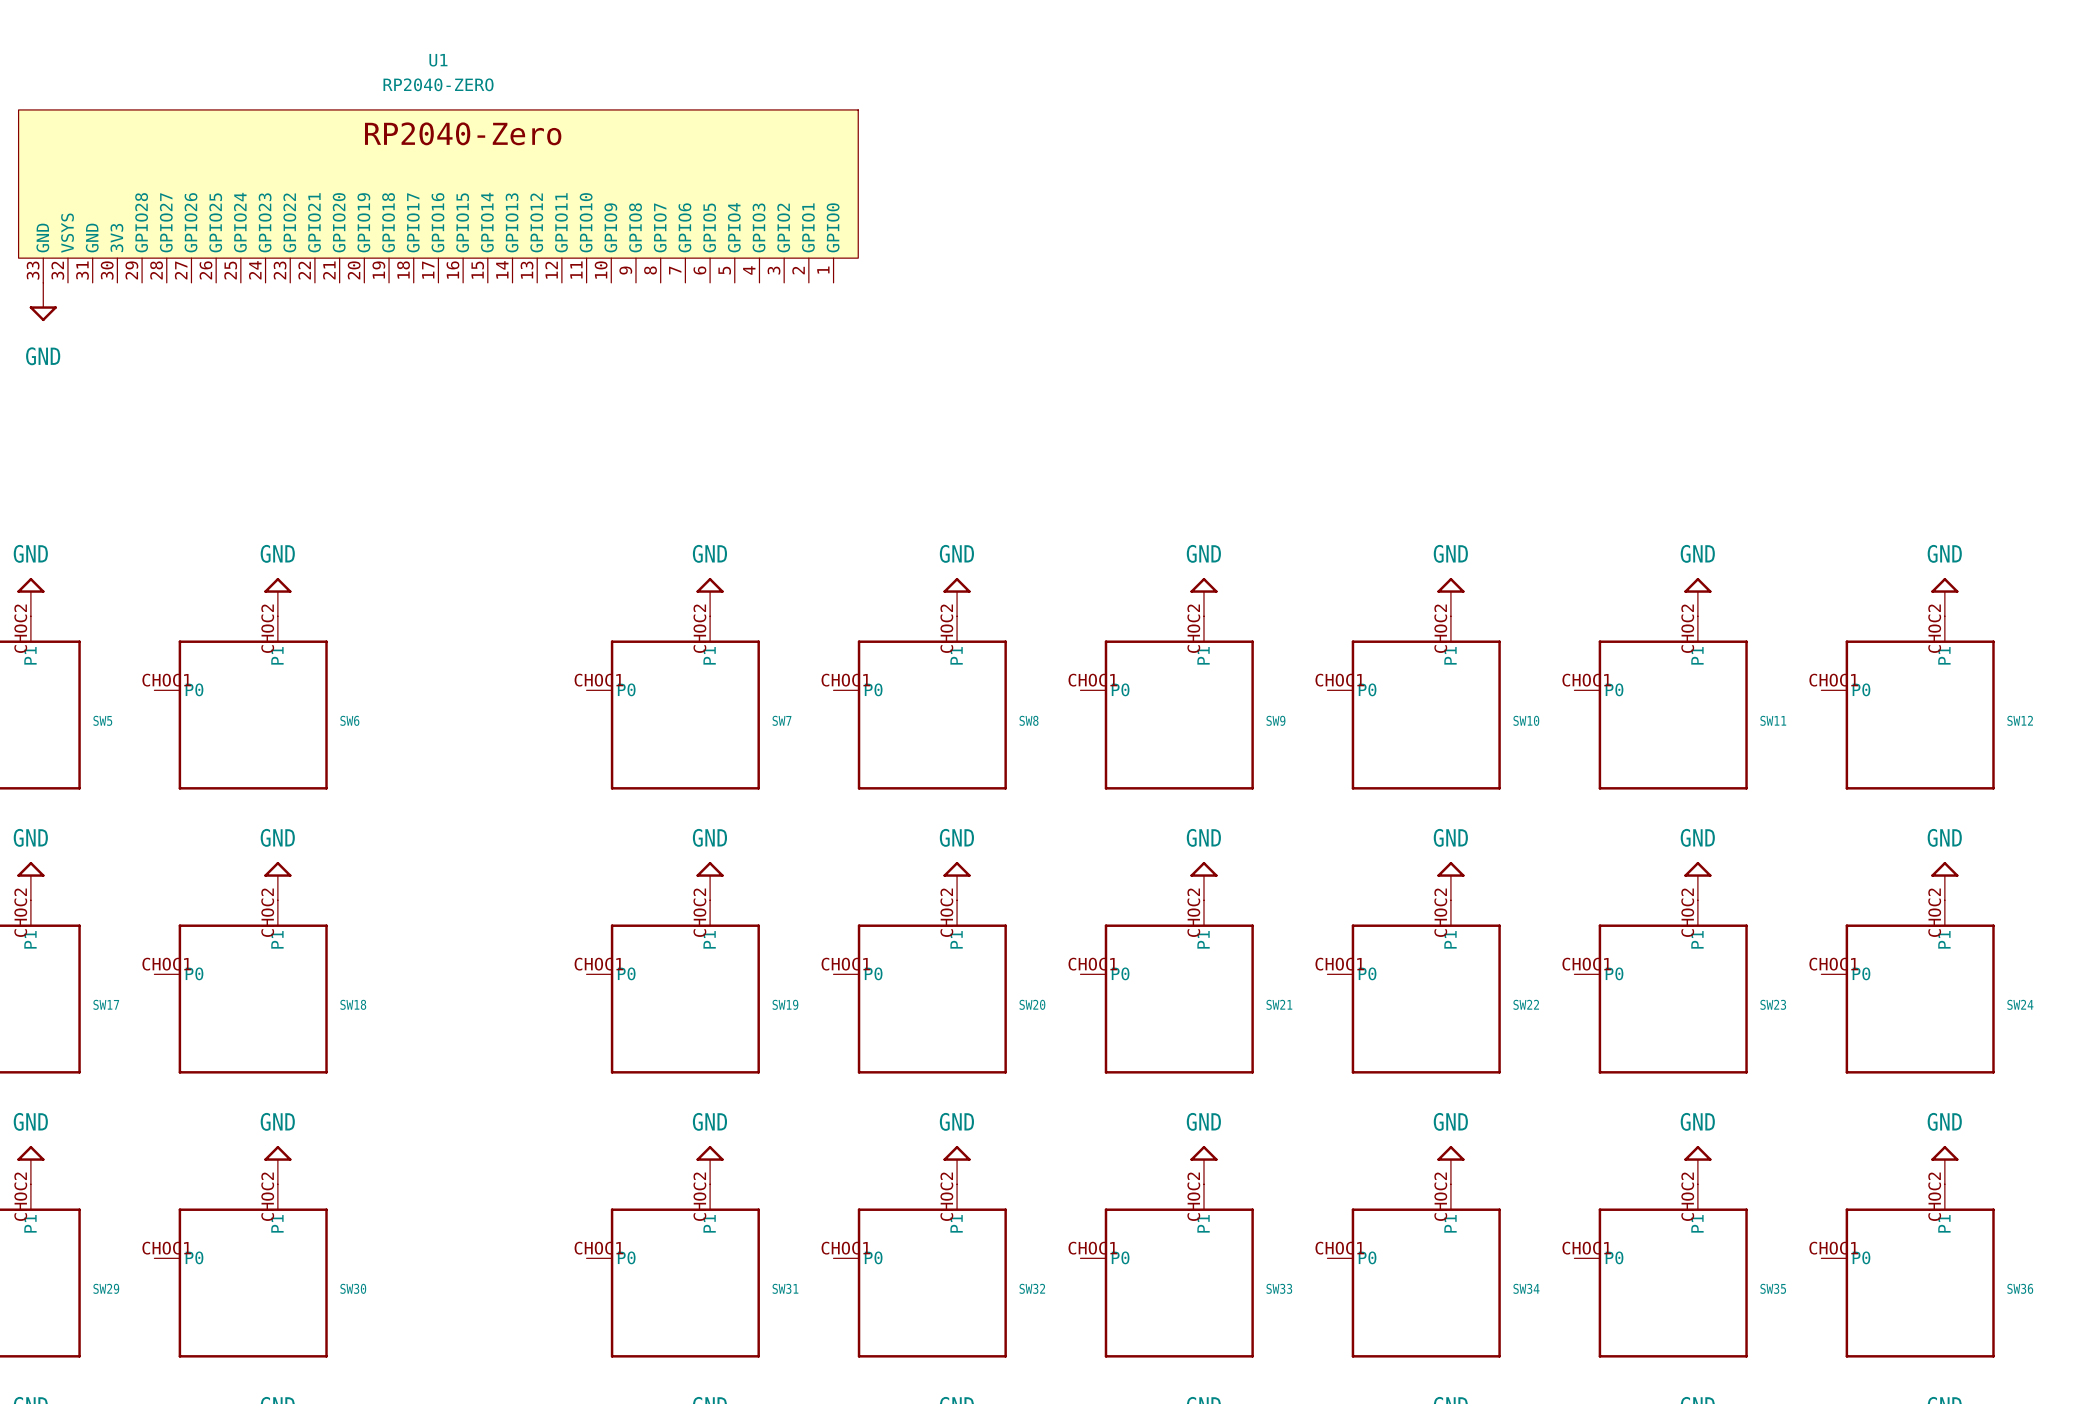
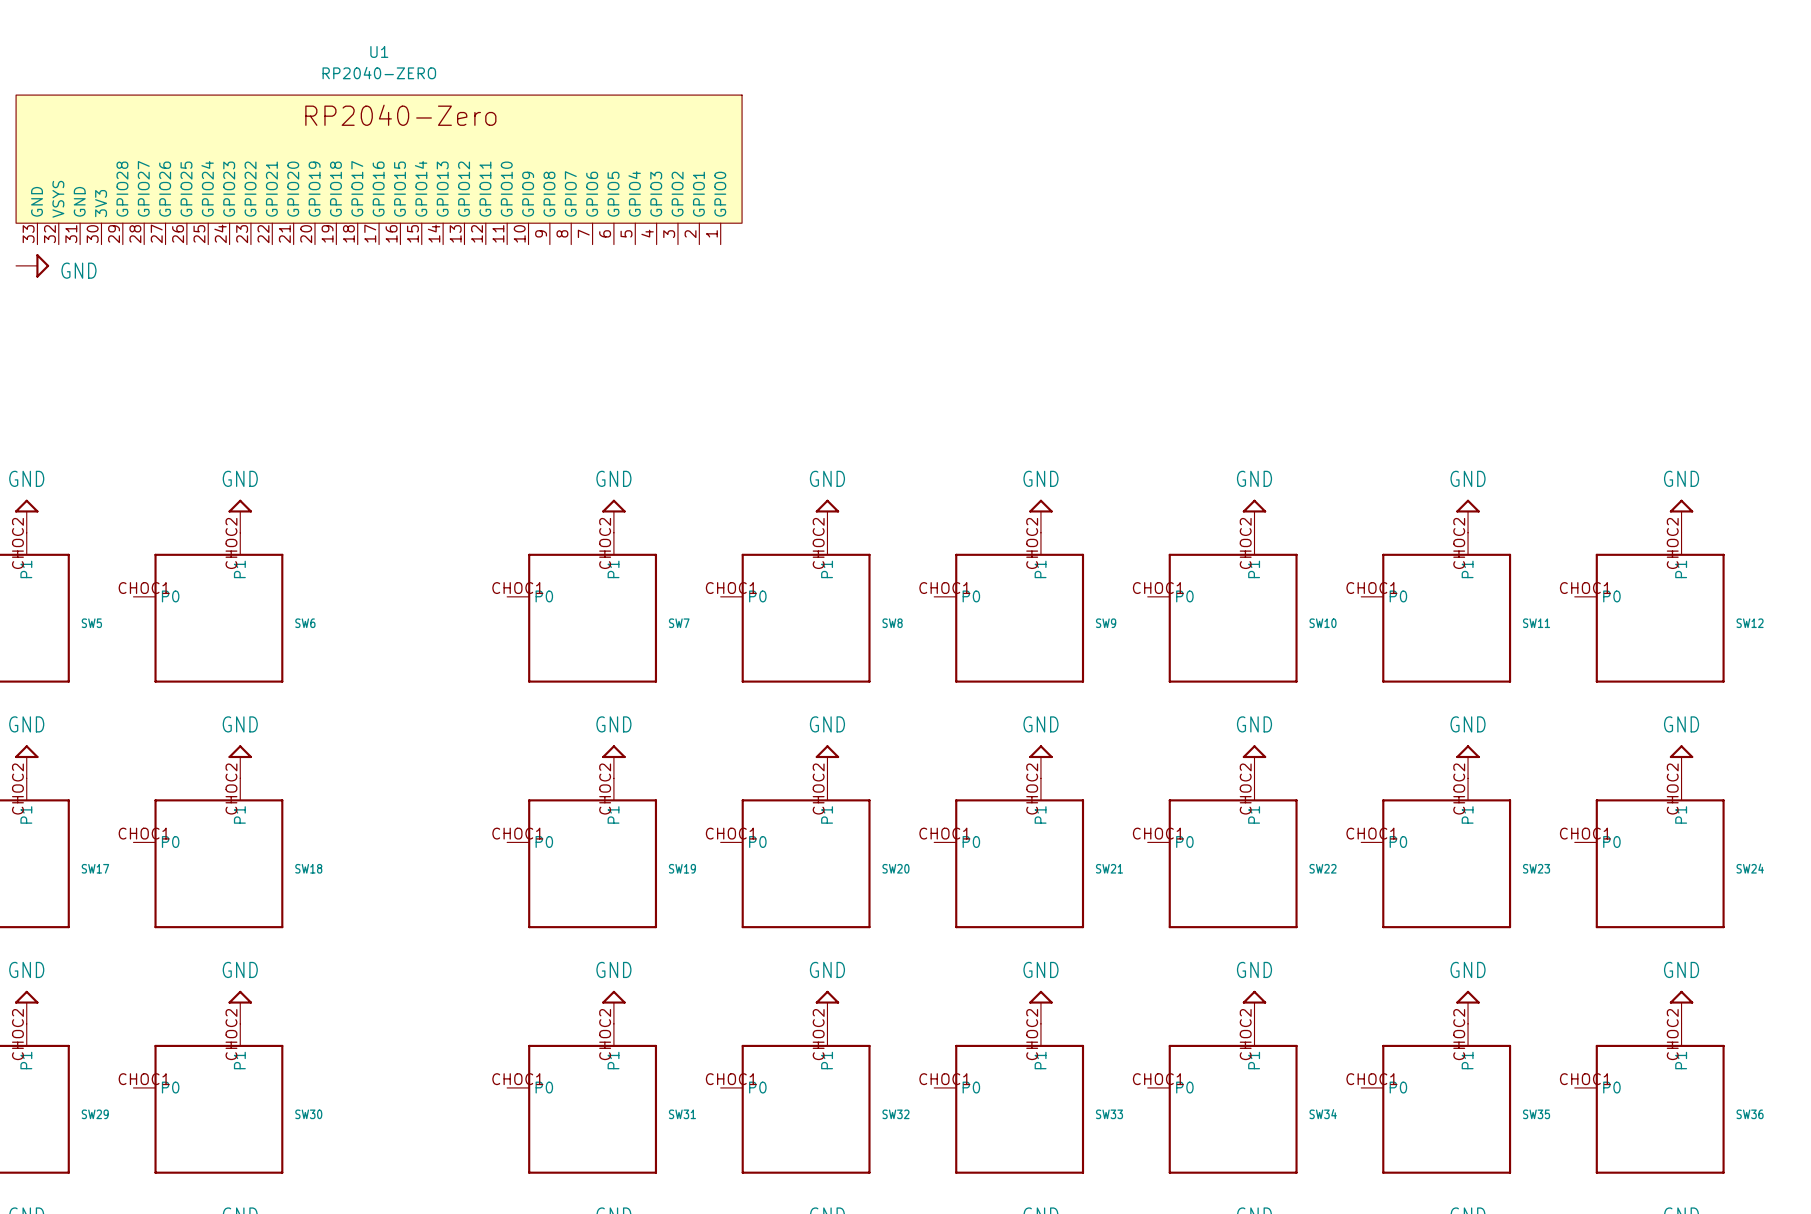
power symbol rotation: 0° (43, 313) -> 90° counterclockwise (42, 265)

